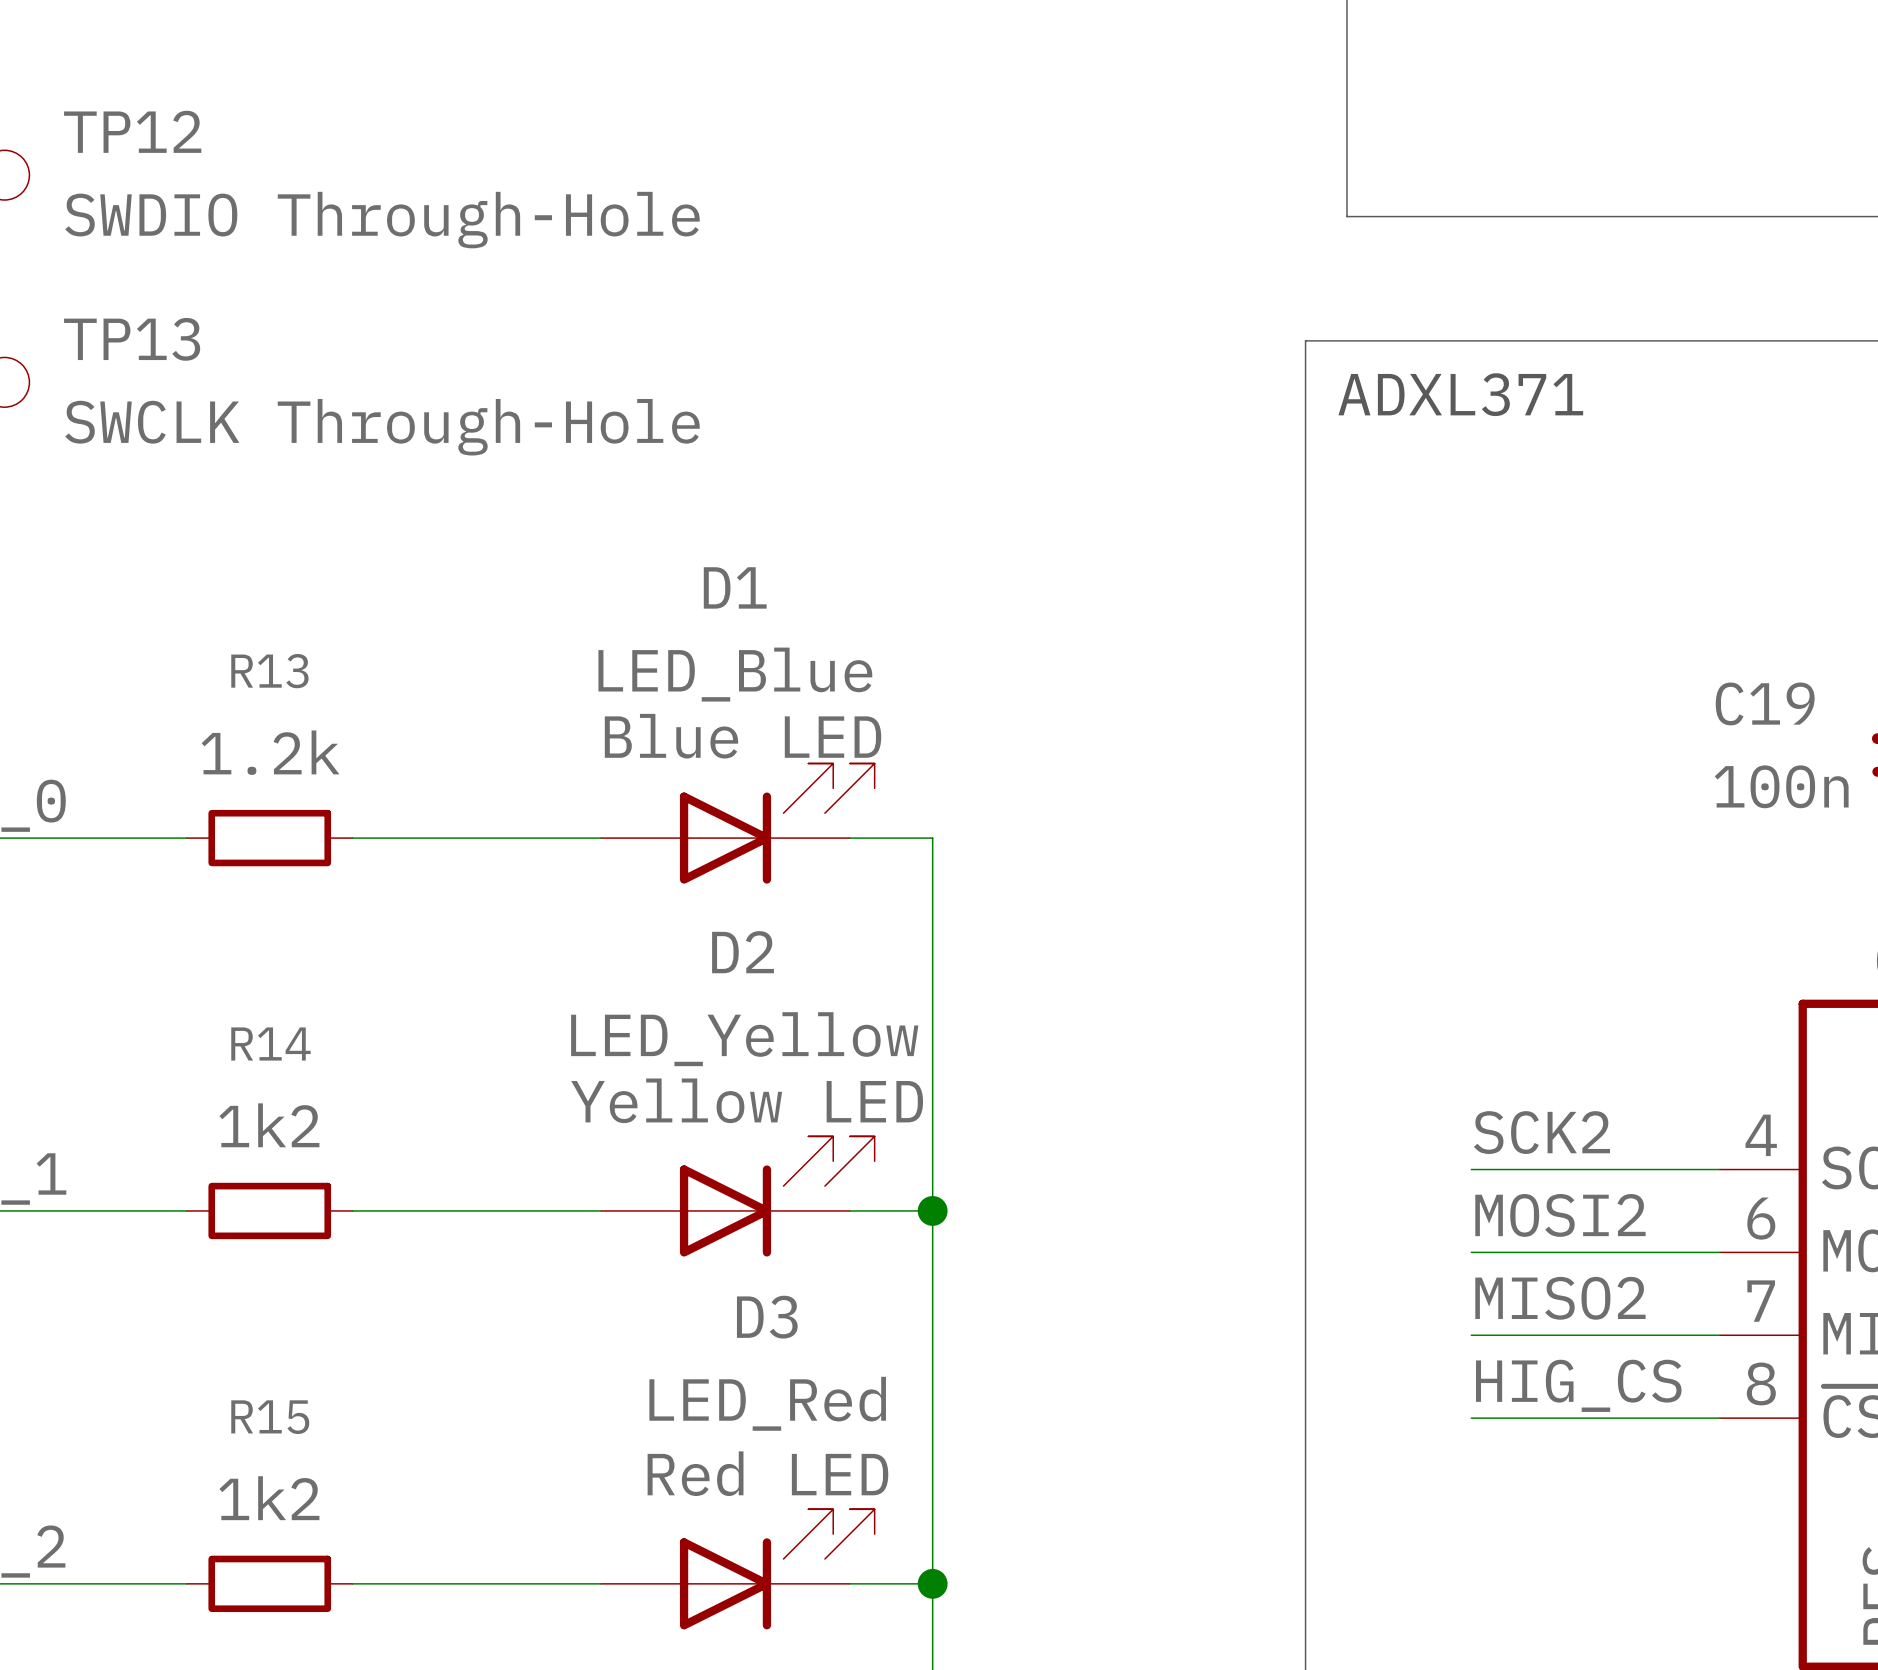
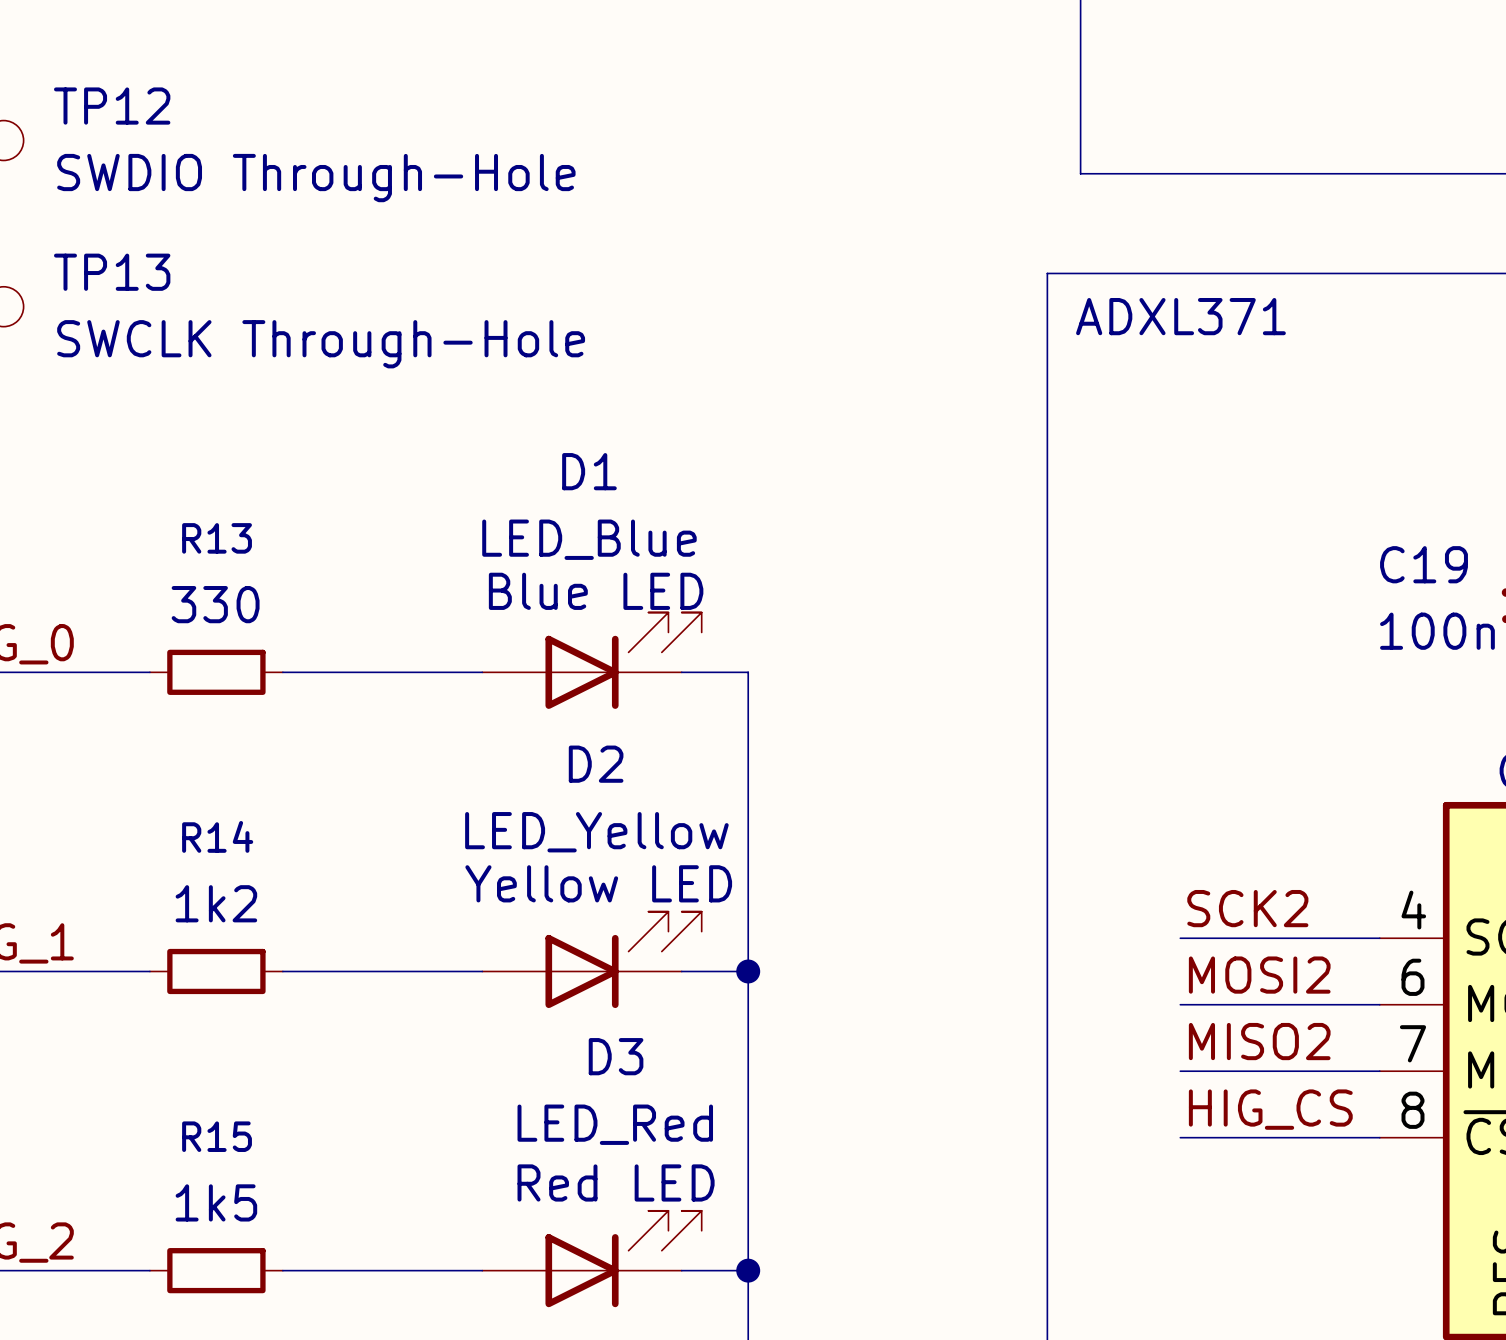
R13 value: 1.2k (270, 752) -> 330 (215, 604)
R15 value: 1k2 (269, 1498) -> 1k5 (216, 1202)

